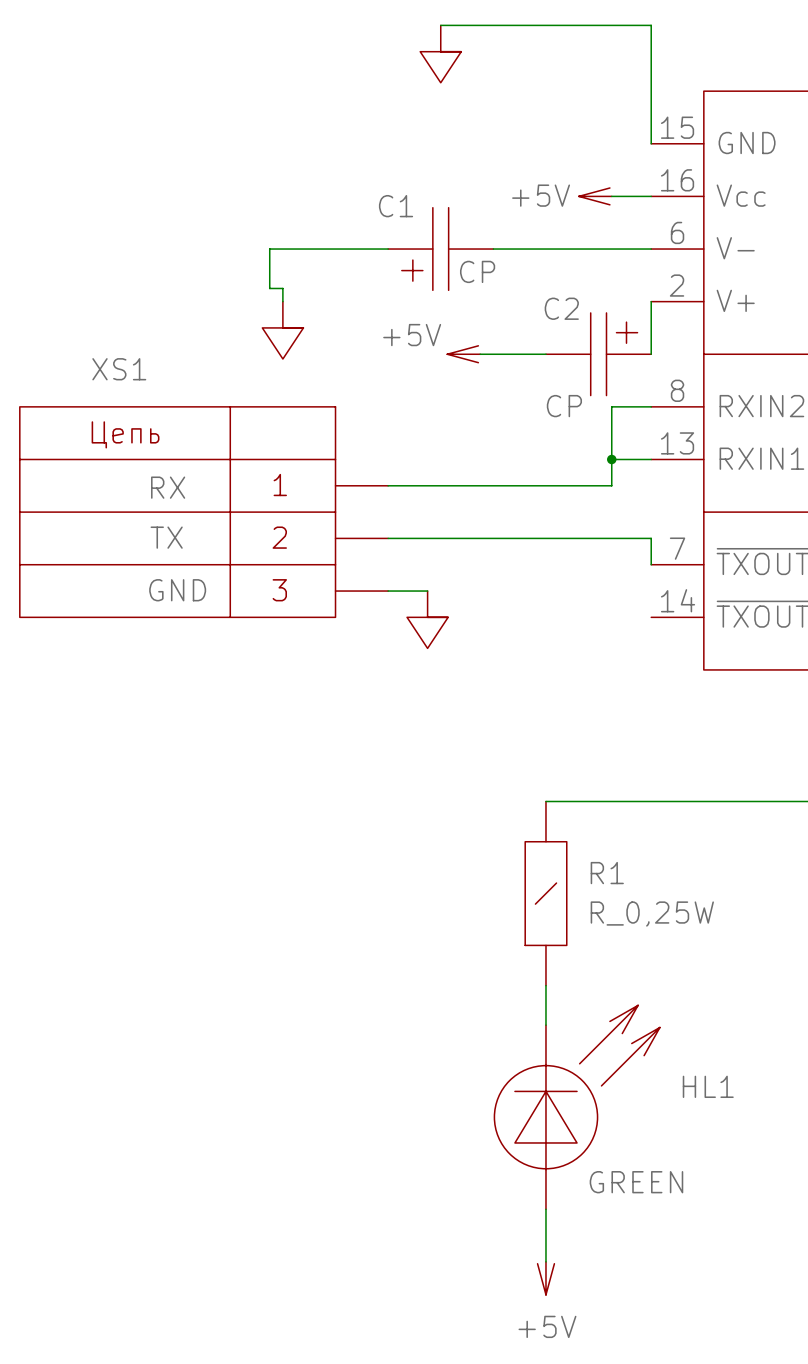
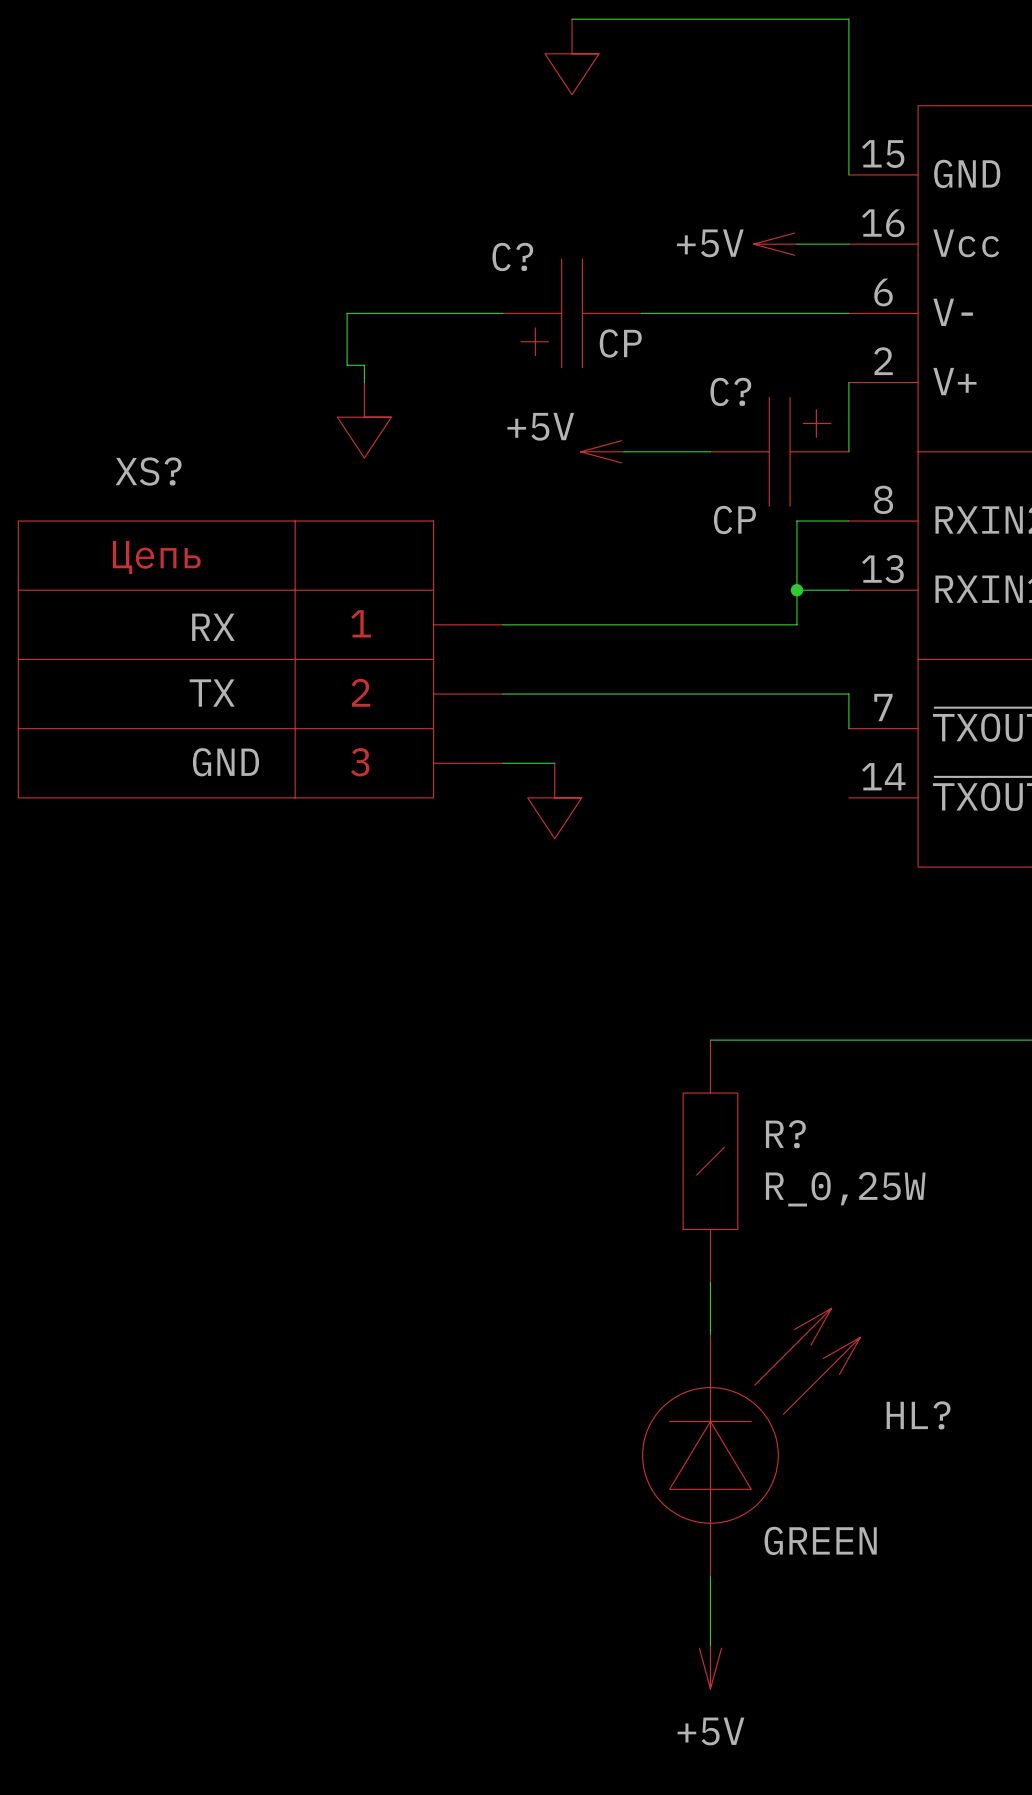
C1 name: C1 (396, 206) -> C? (512, 256)
C2 name: C2 (561, 308) -> C? (730, 391)
XS1 name: XS1 (119, 369) -> XS? (148, 471)
R1 name: R1 (607, 873) -> R? (785, 1134)
HL1 name: HL1 (708, 1086) -> HL? (918, 1415)

